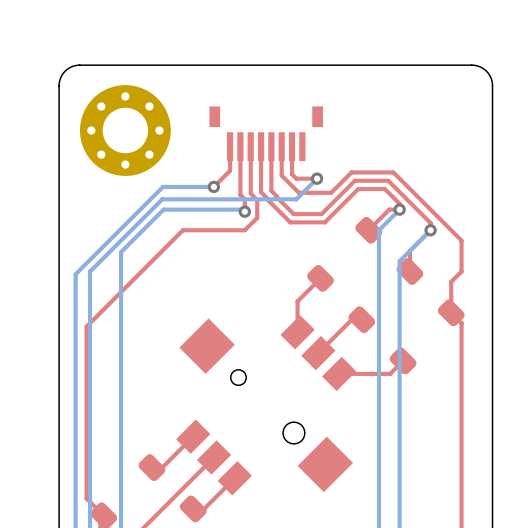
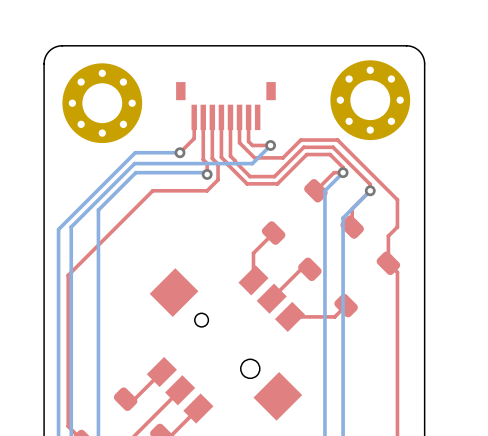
part: none -> (370, 100)

